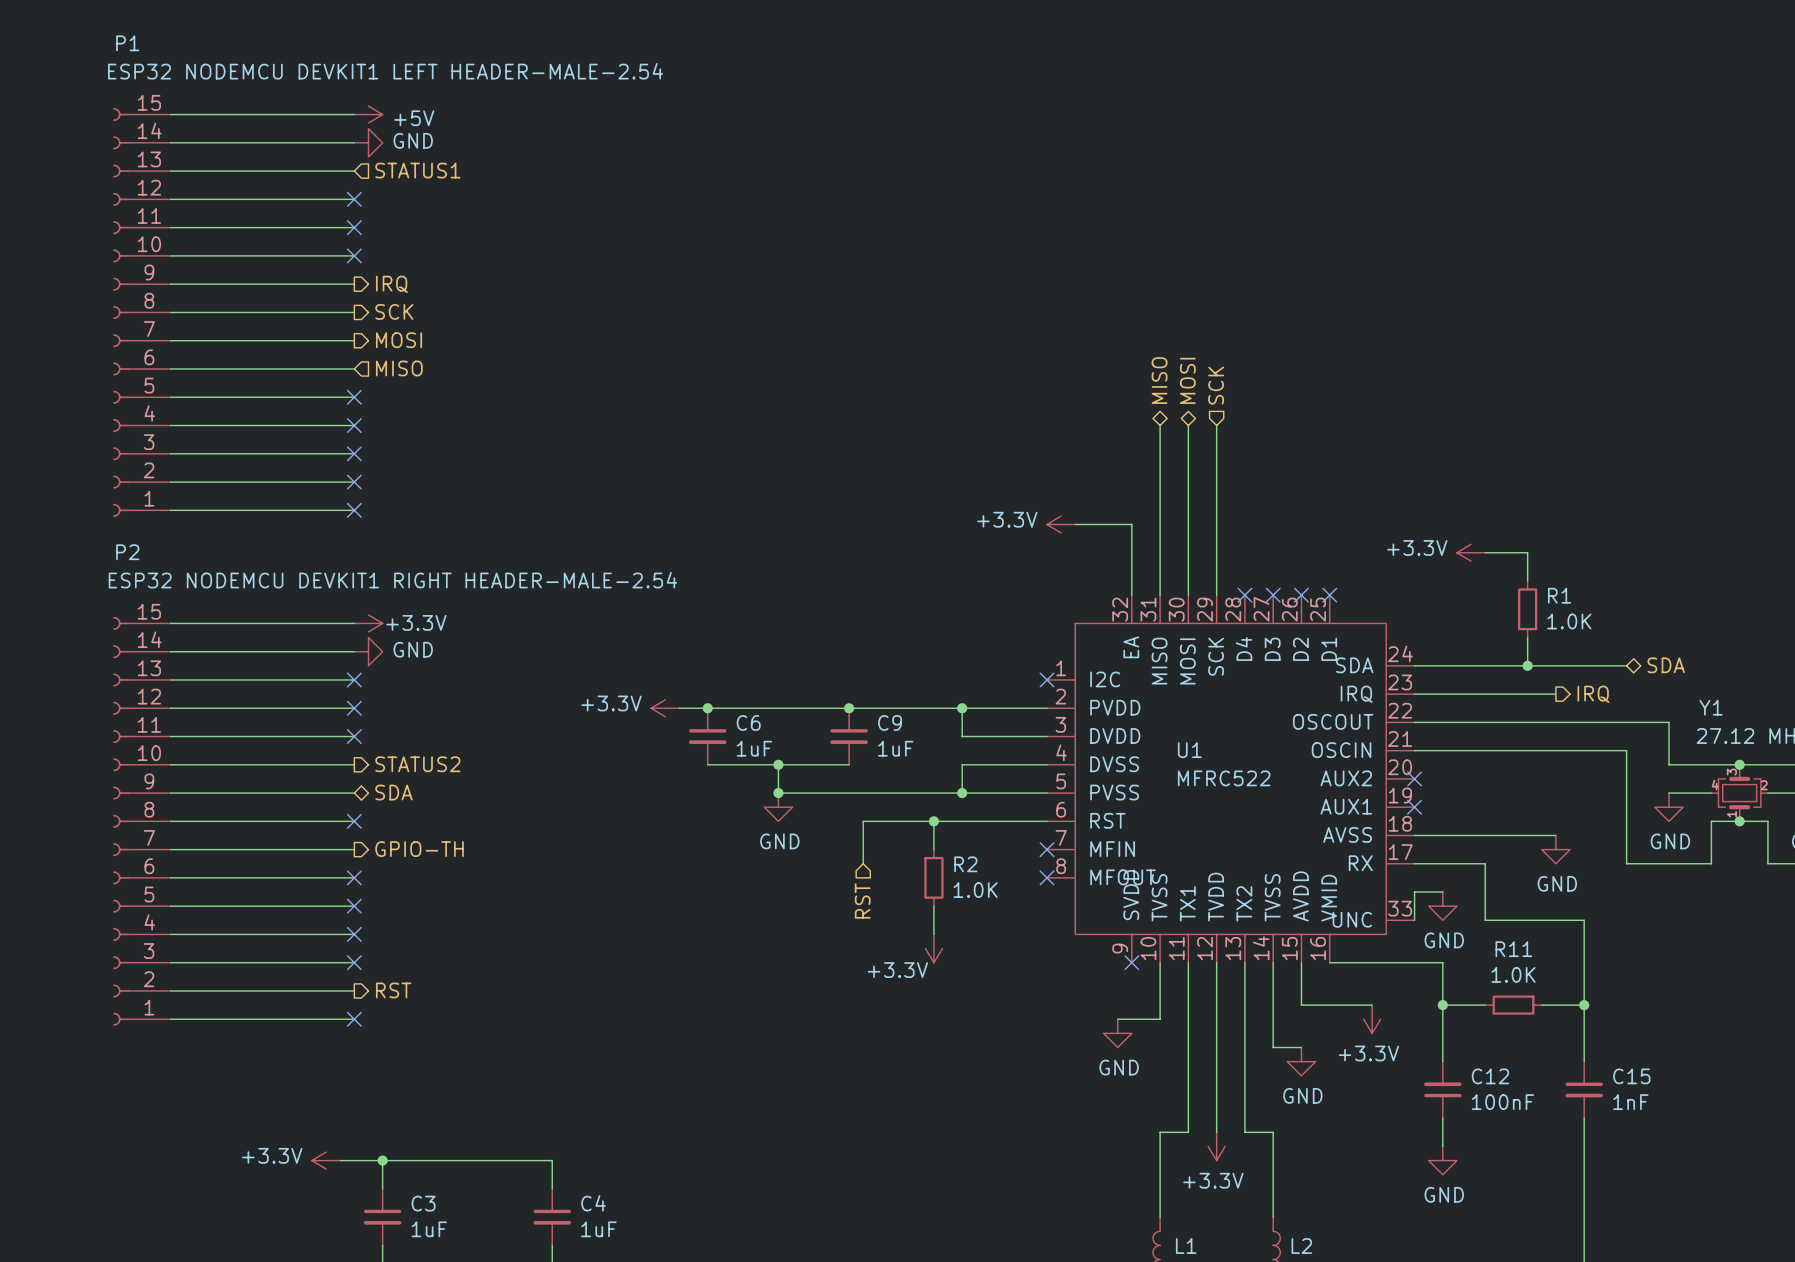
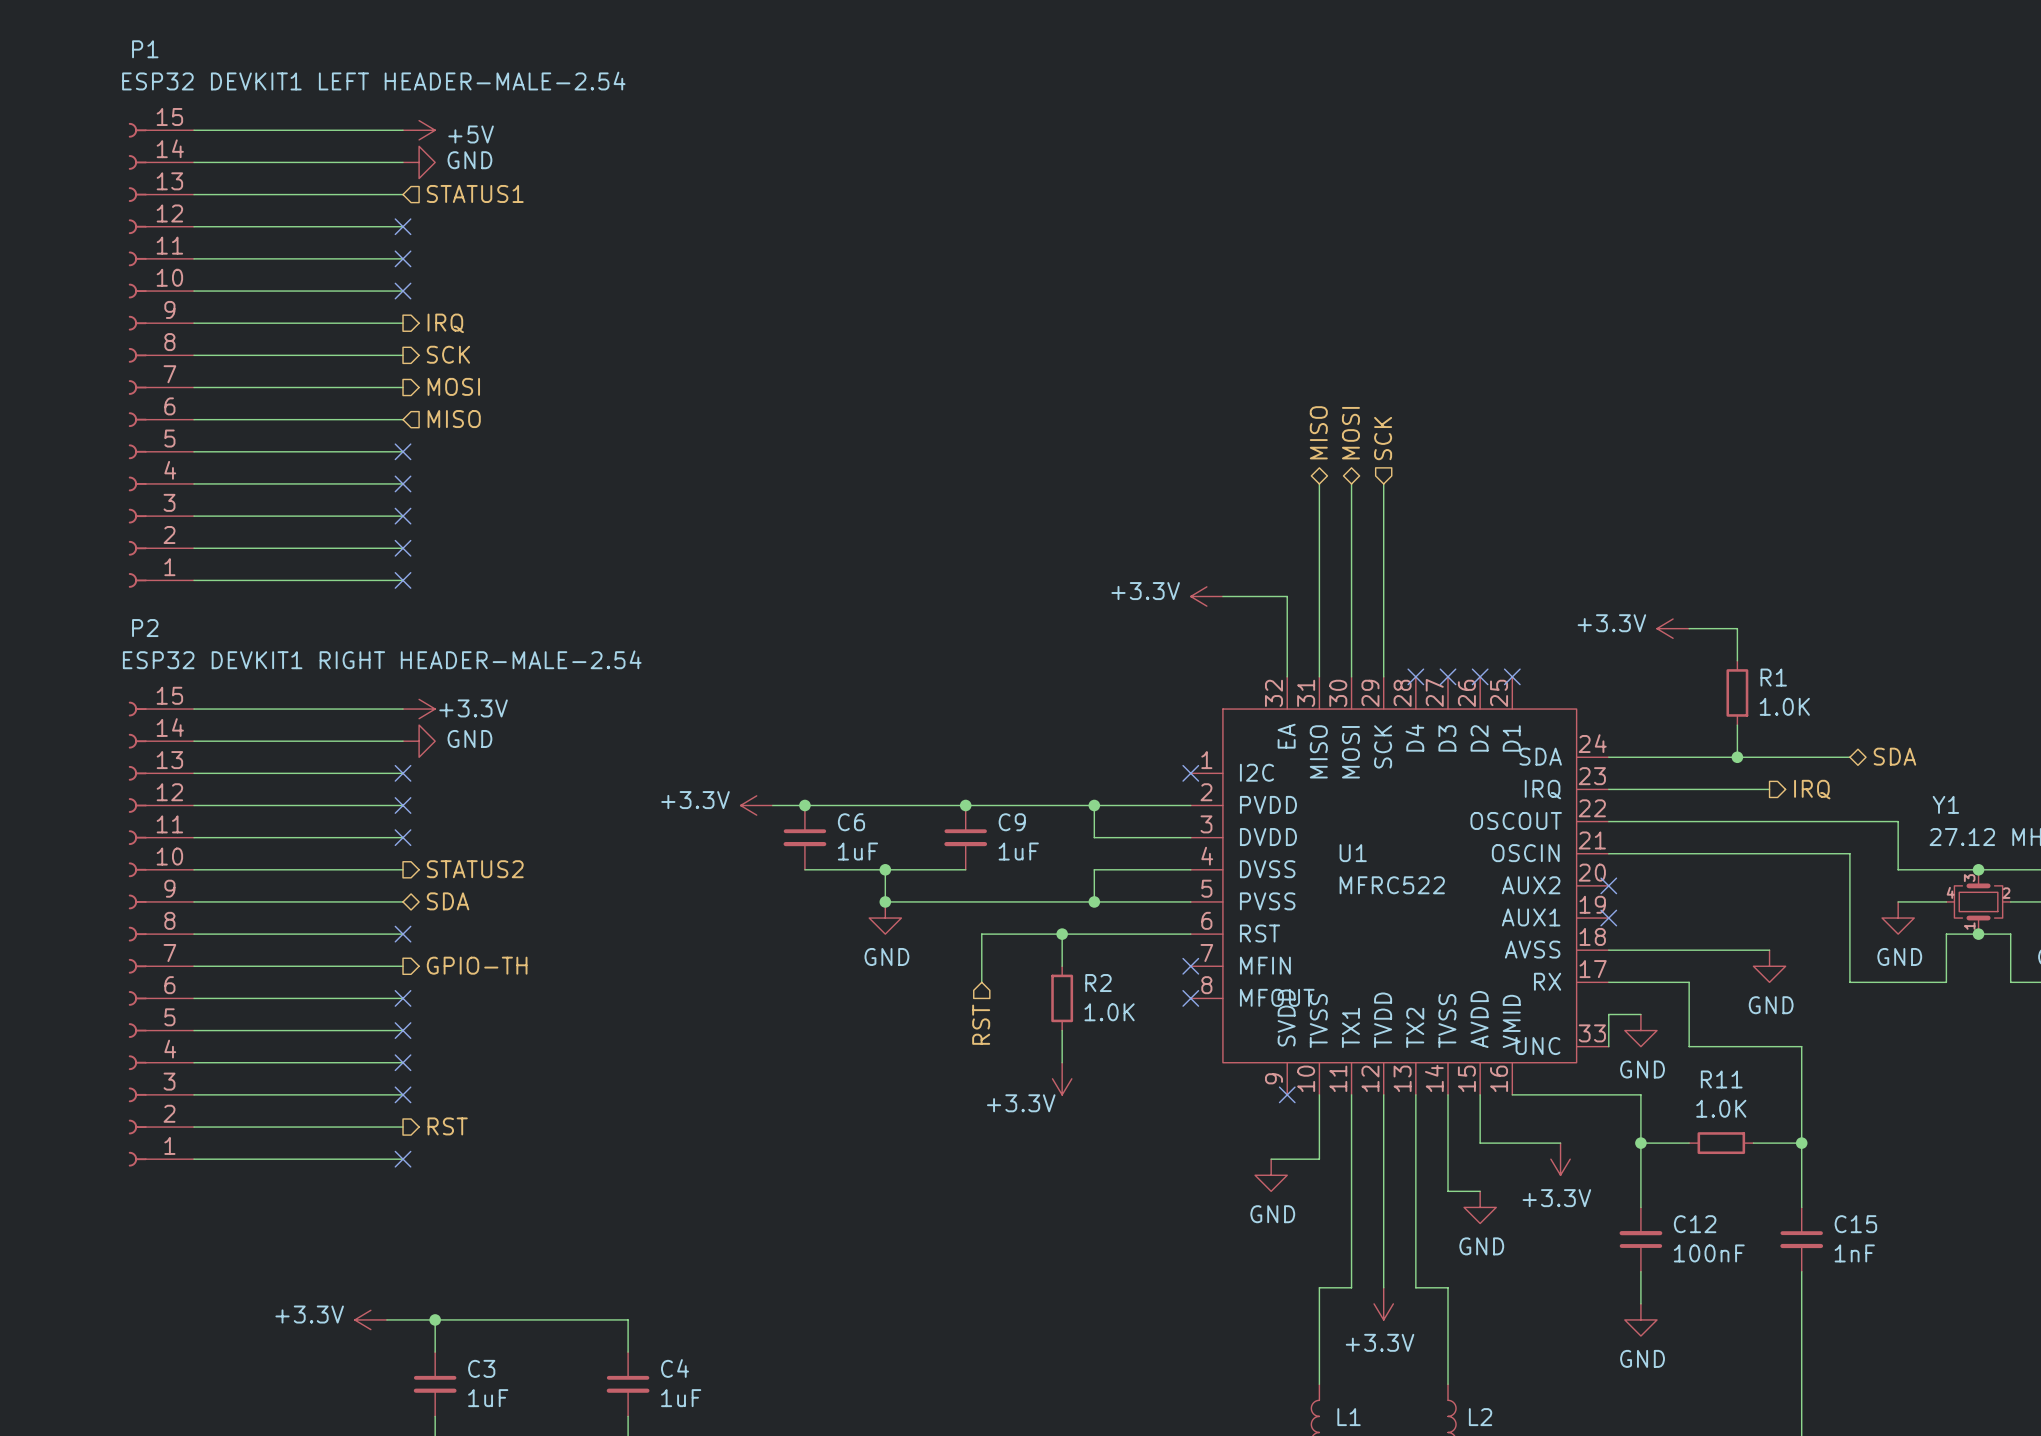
P1 value: ESP32 NODEMCU DEVKIT1 LEFT HEADER-MALE-2.54 (385, 71) -> ESP32 DEVKIT1 LEFT HEADER-MALE-2.54 (373, 81)
P2 value: ESP32 NODEMCU DEVKIT1 RIGHT HEADER-MALE-2.54 (392, 580) -> ESP32 DEVKIT1 RIGHT HEADER-MALE-2.54 (382, 659)

